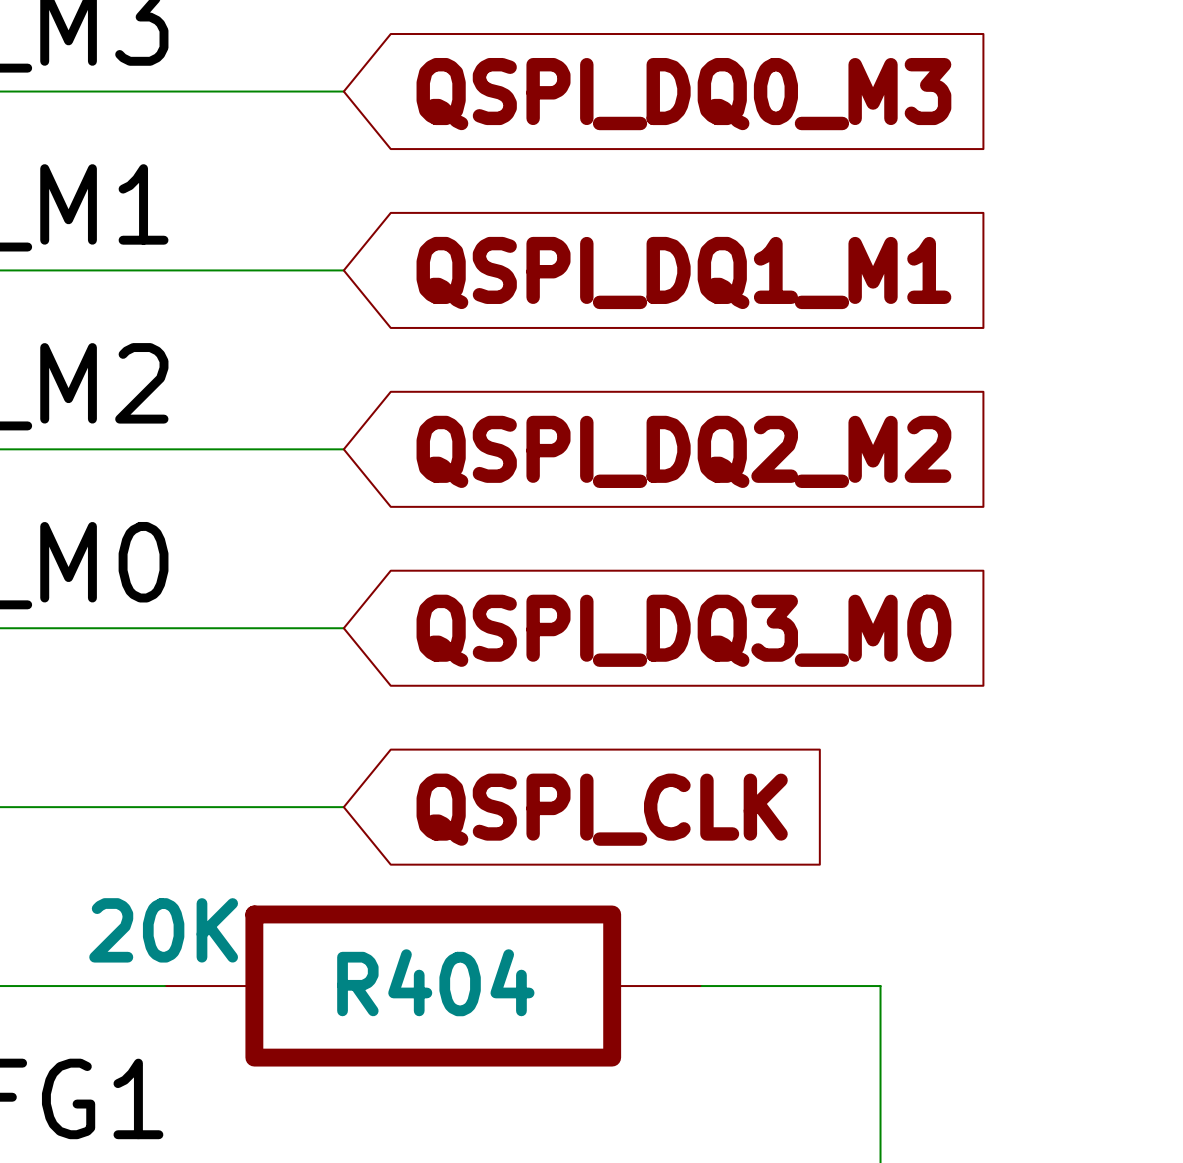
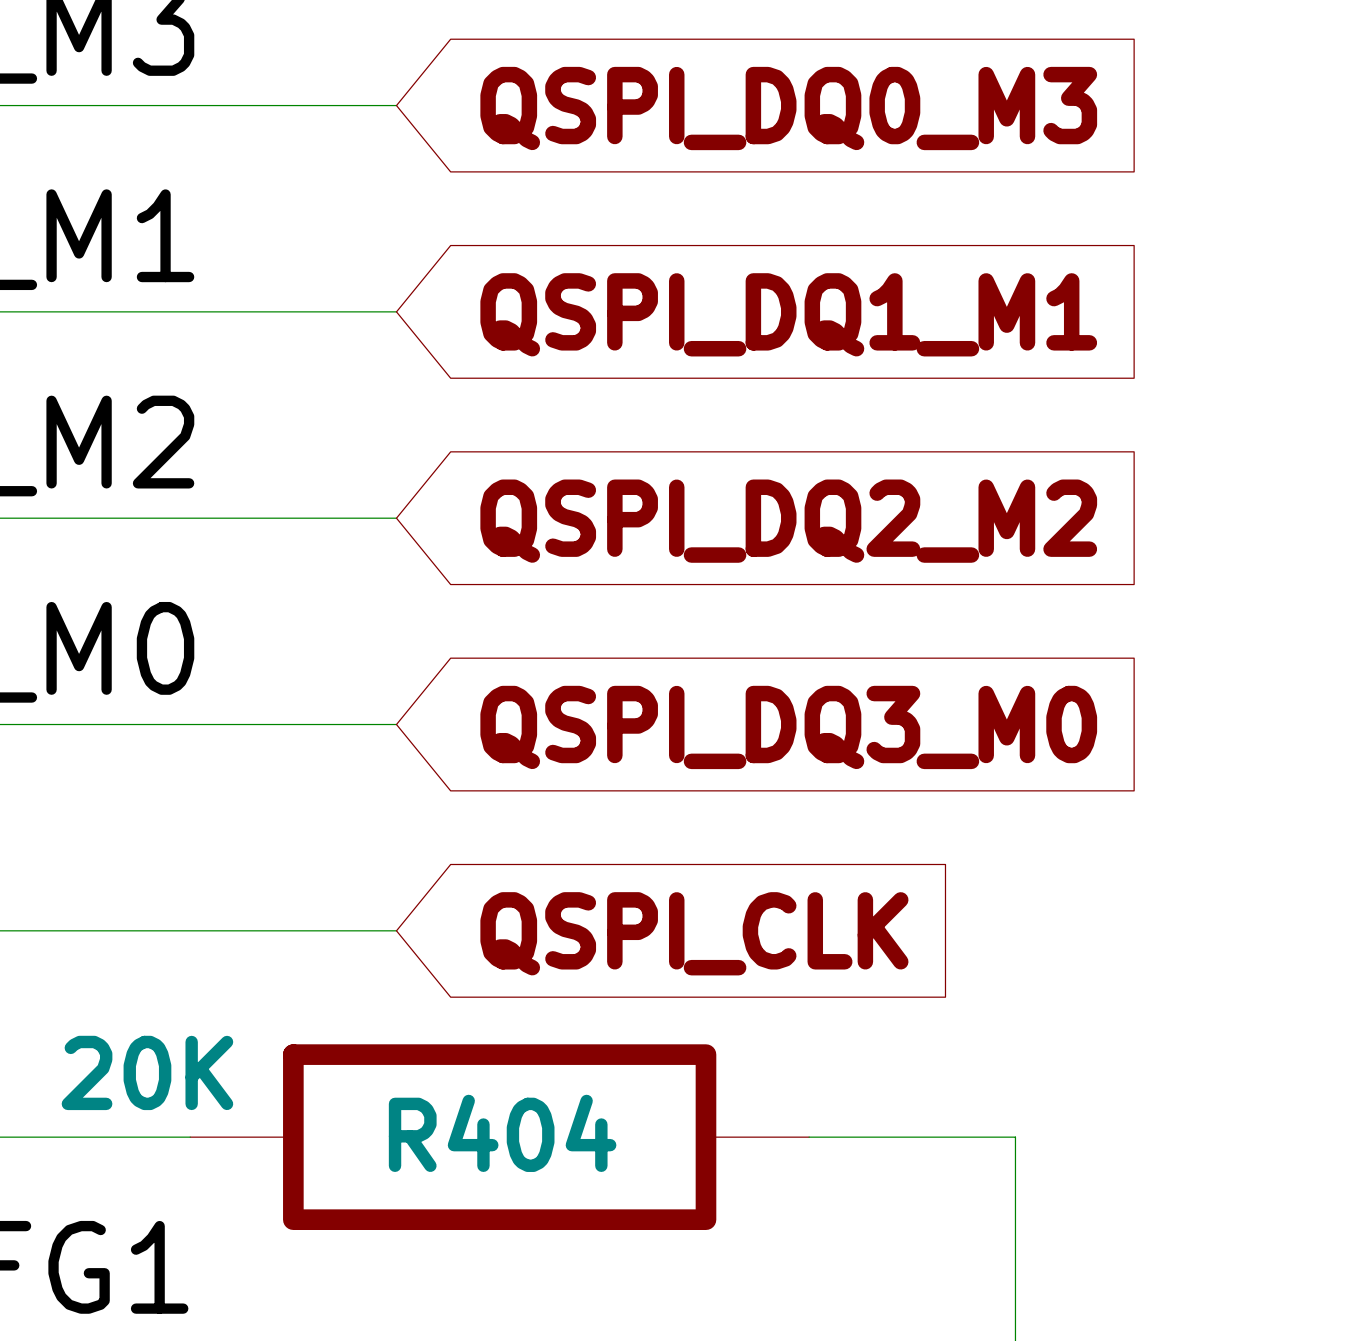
R404 value position: 20K (163, 930) -> 20K (147, 1072)

